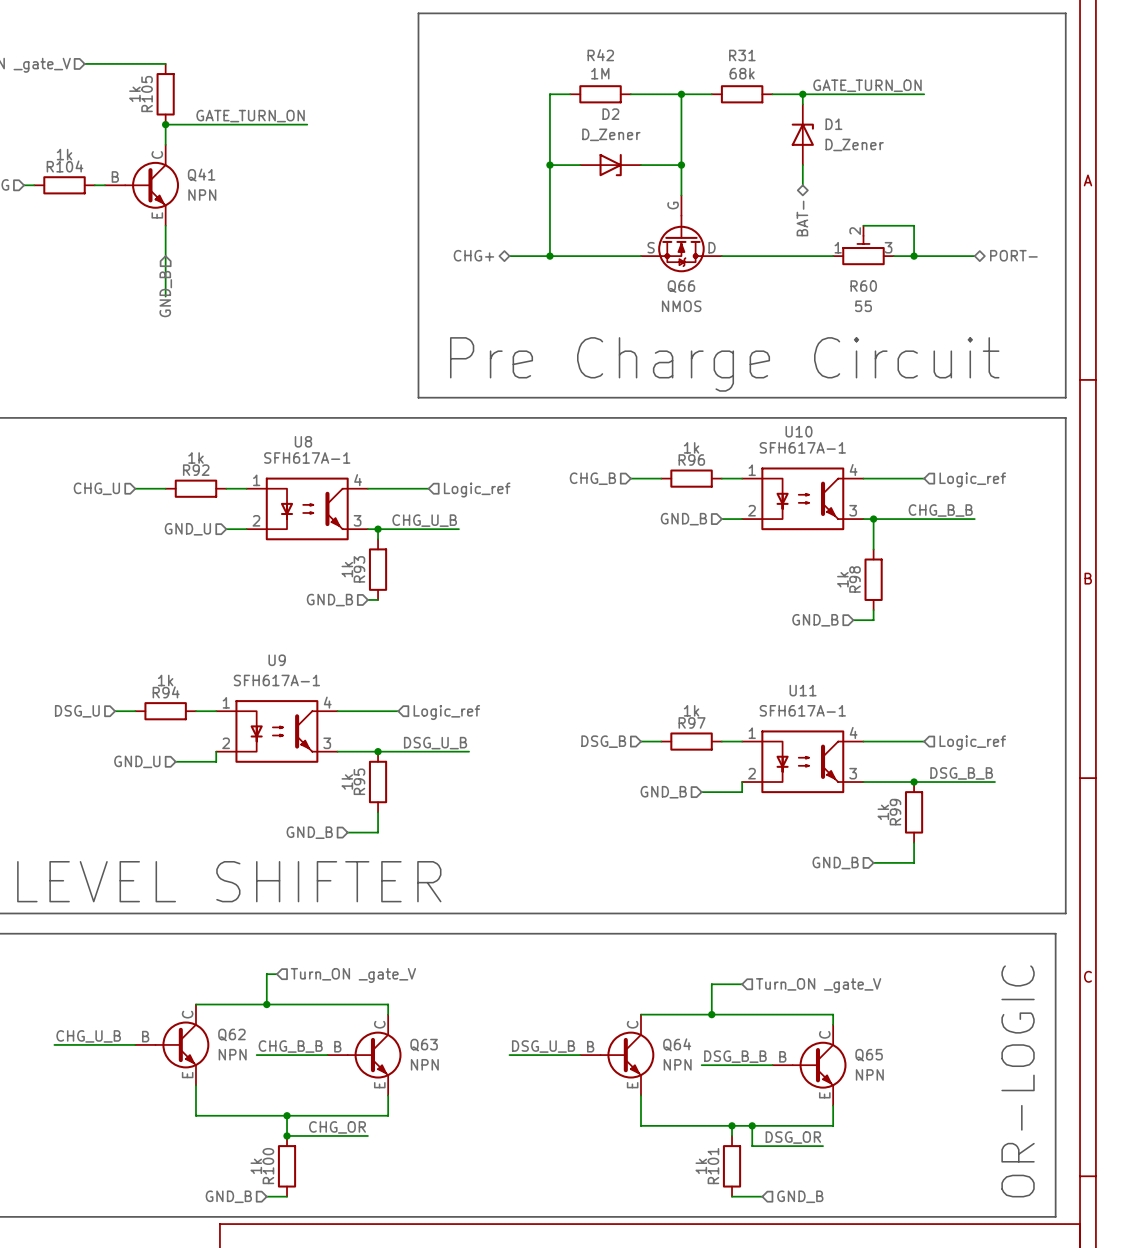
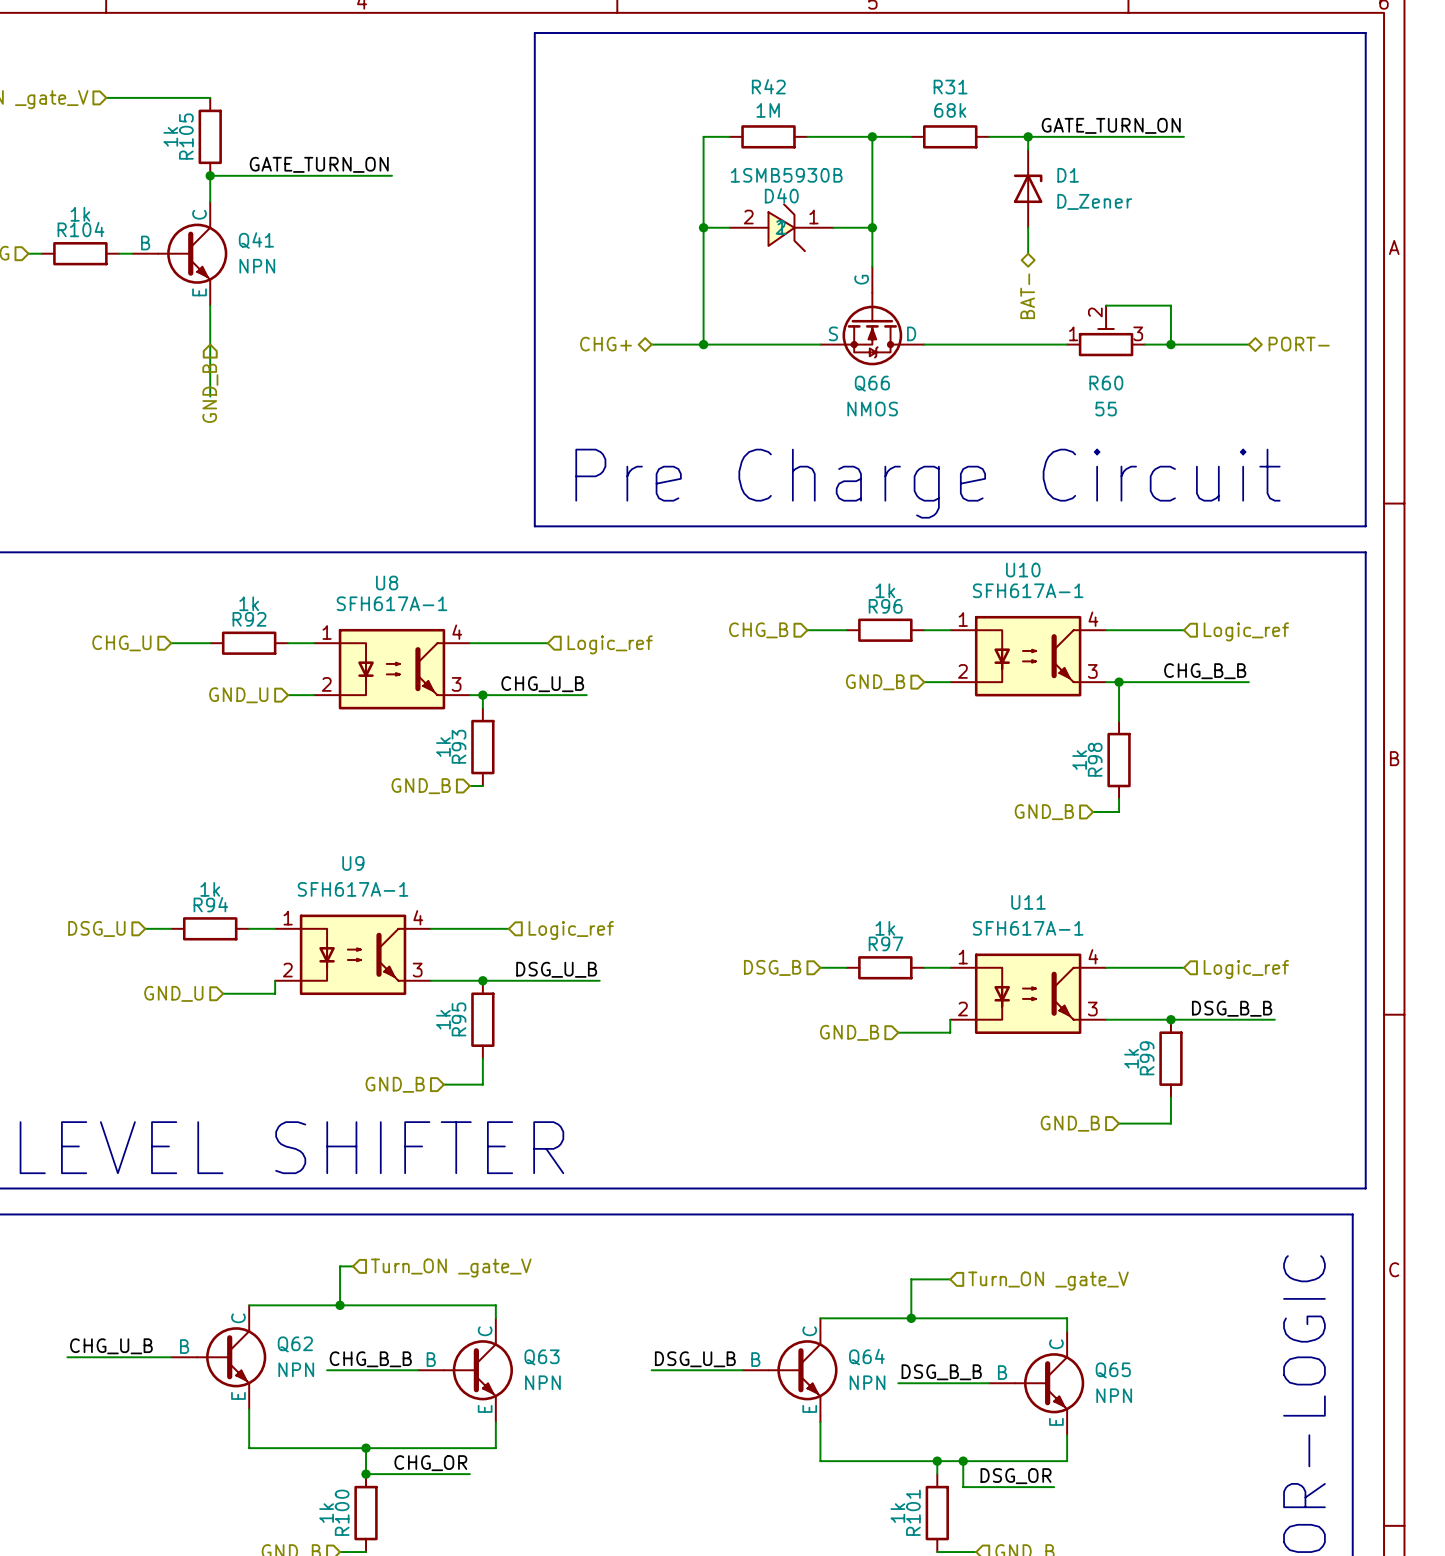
D2: D_Zener (610, 165) -> none
D40: none -> 1SMB5930B (781, 227)

